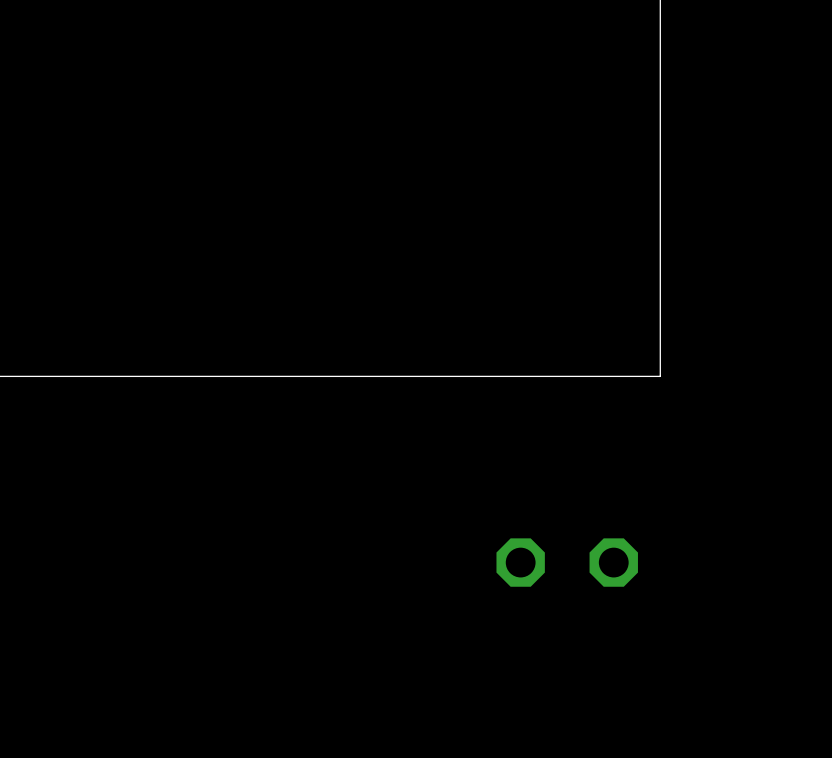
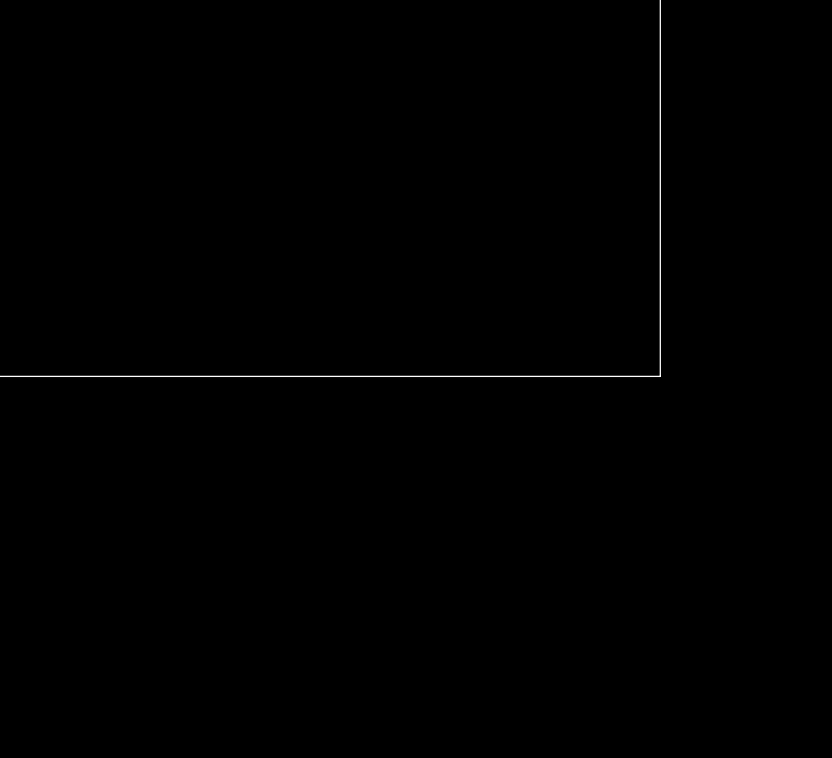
part: (567, 562) -> none

